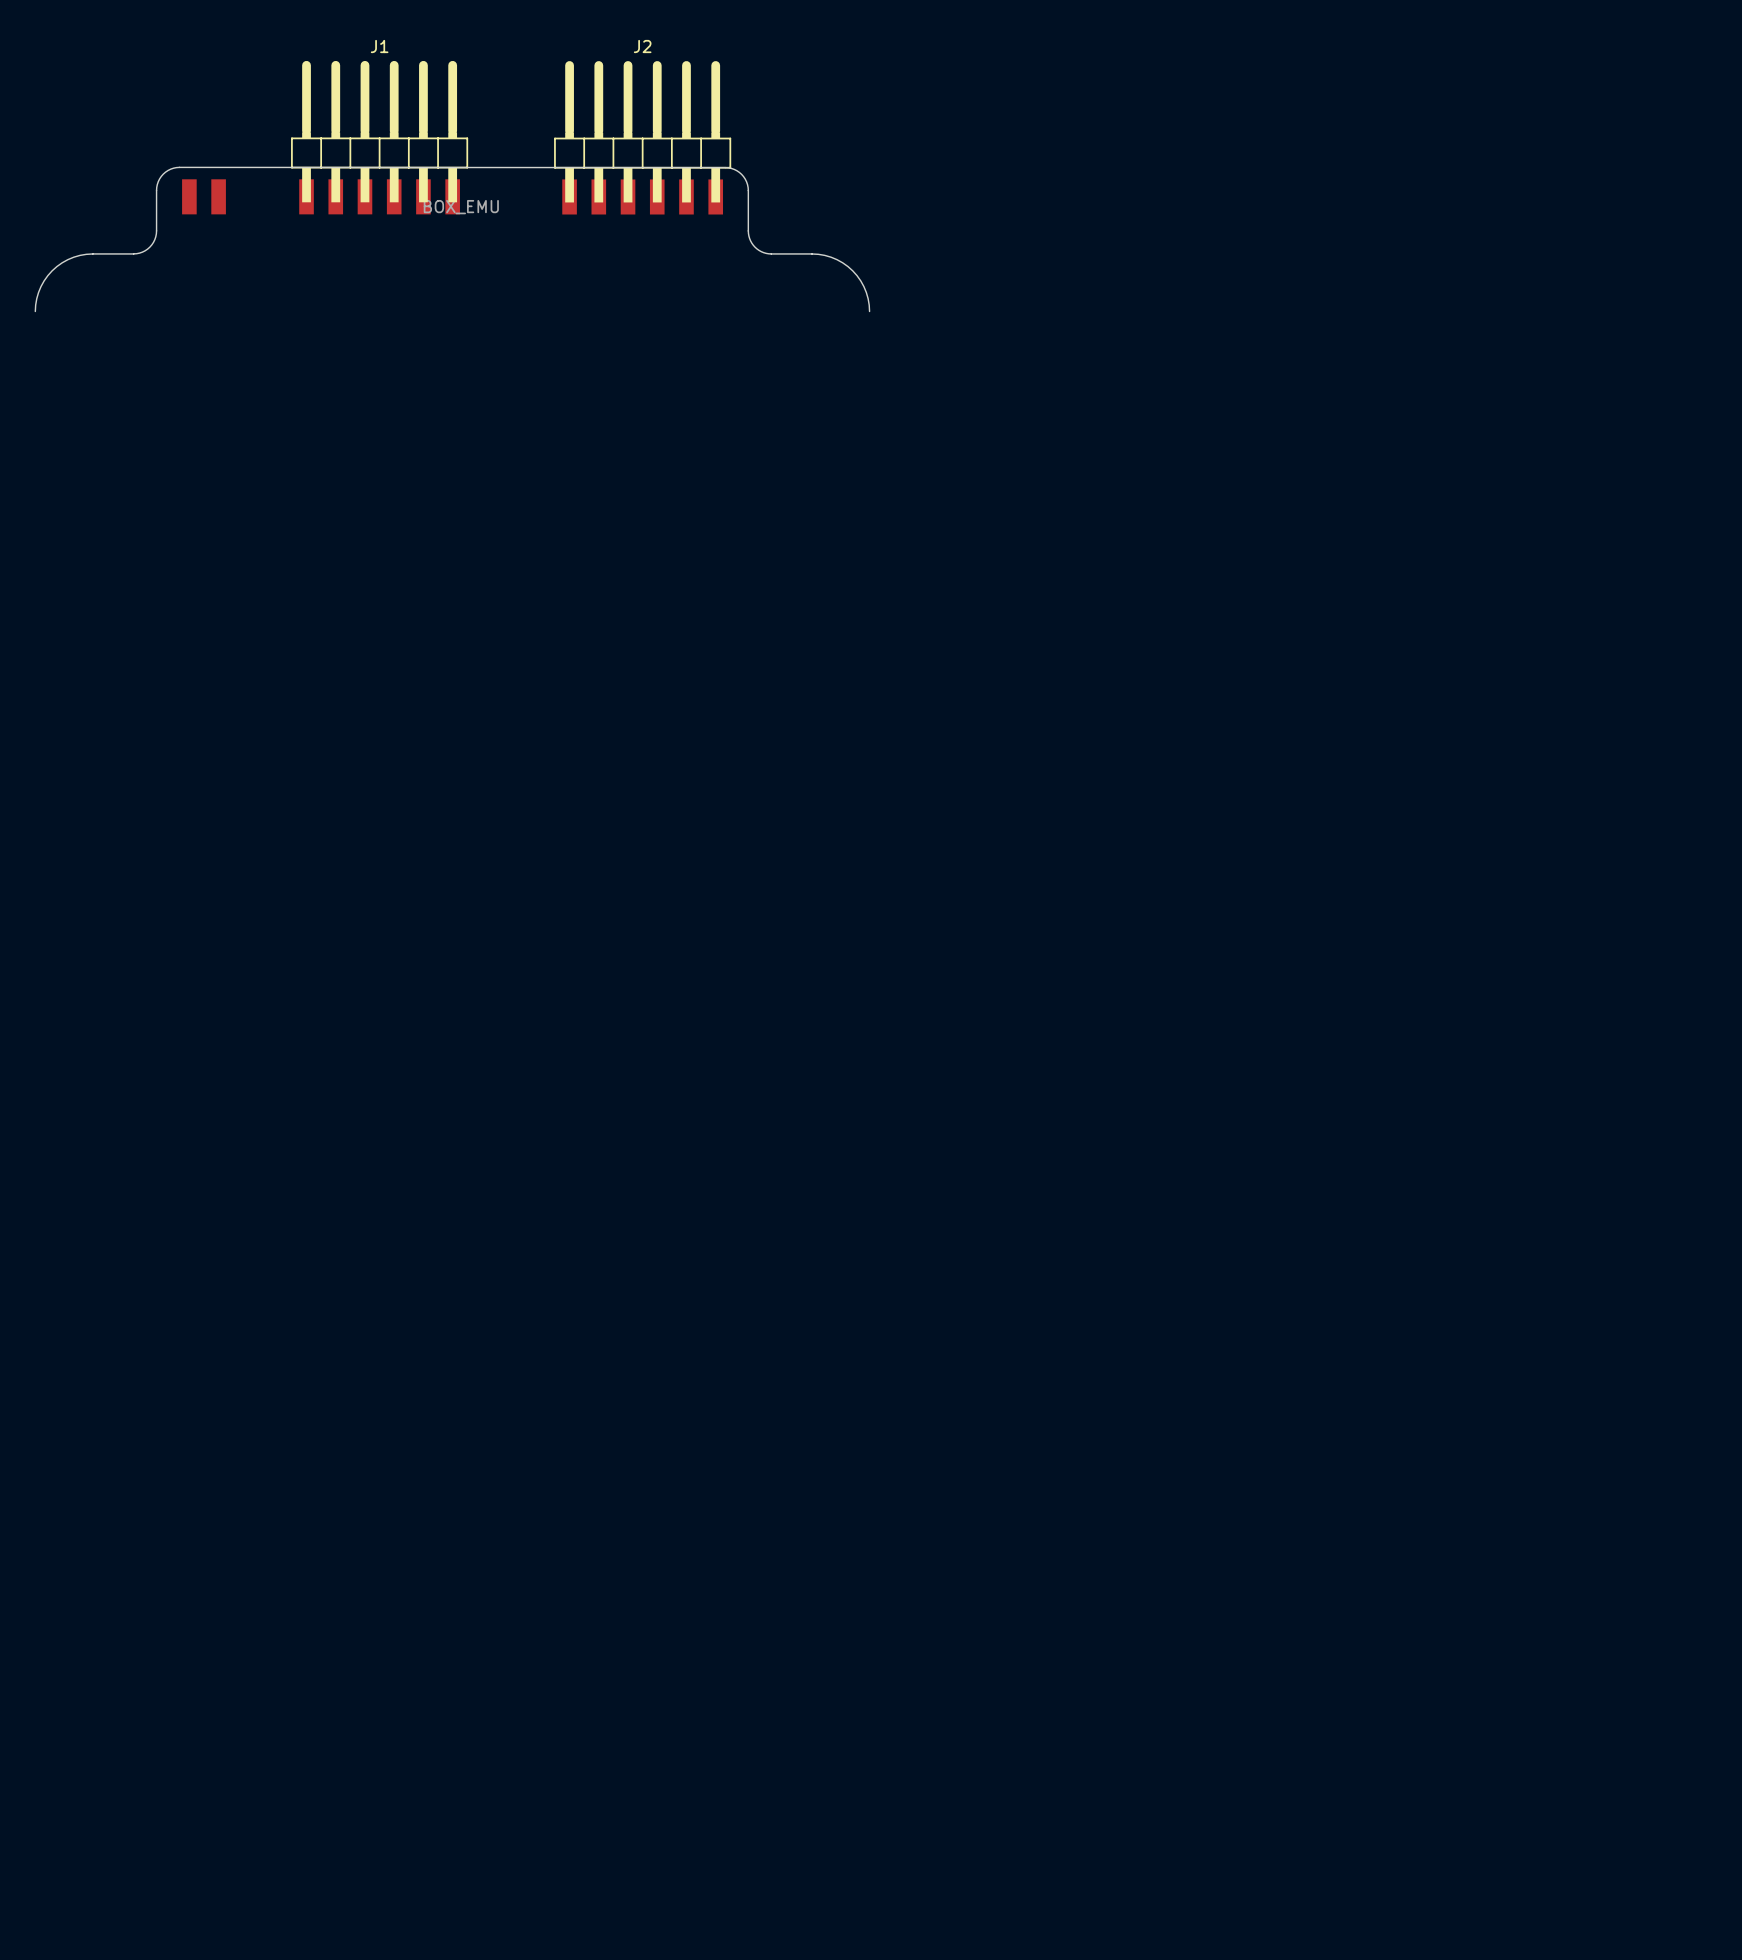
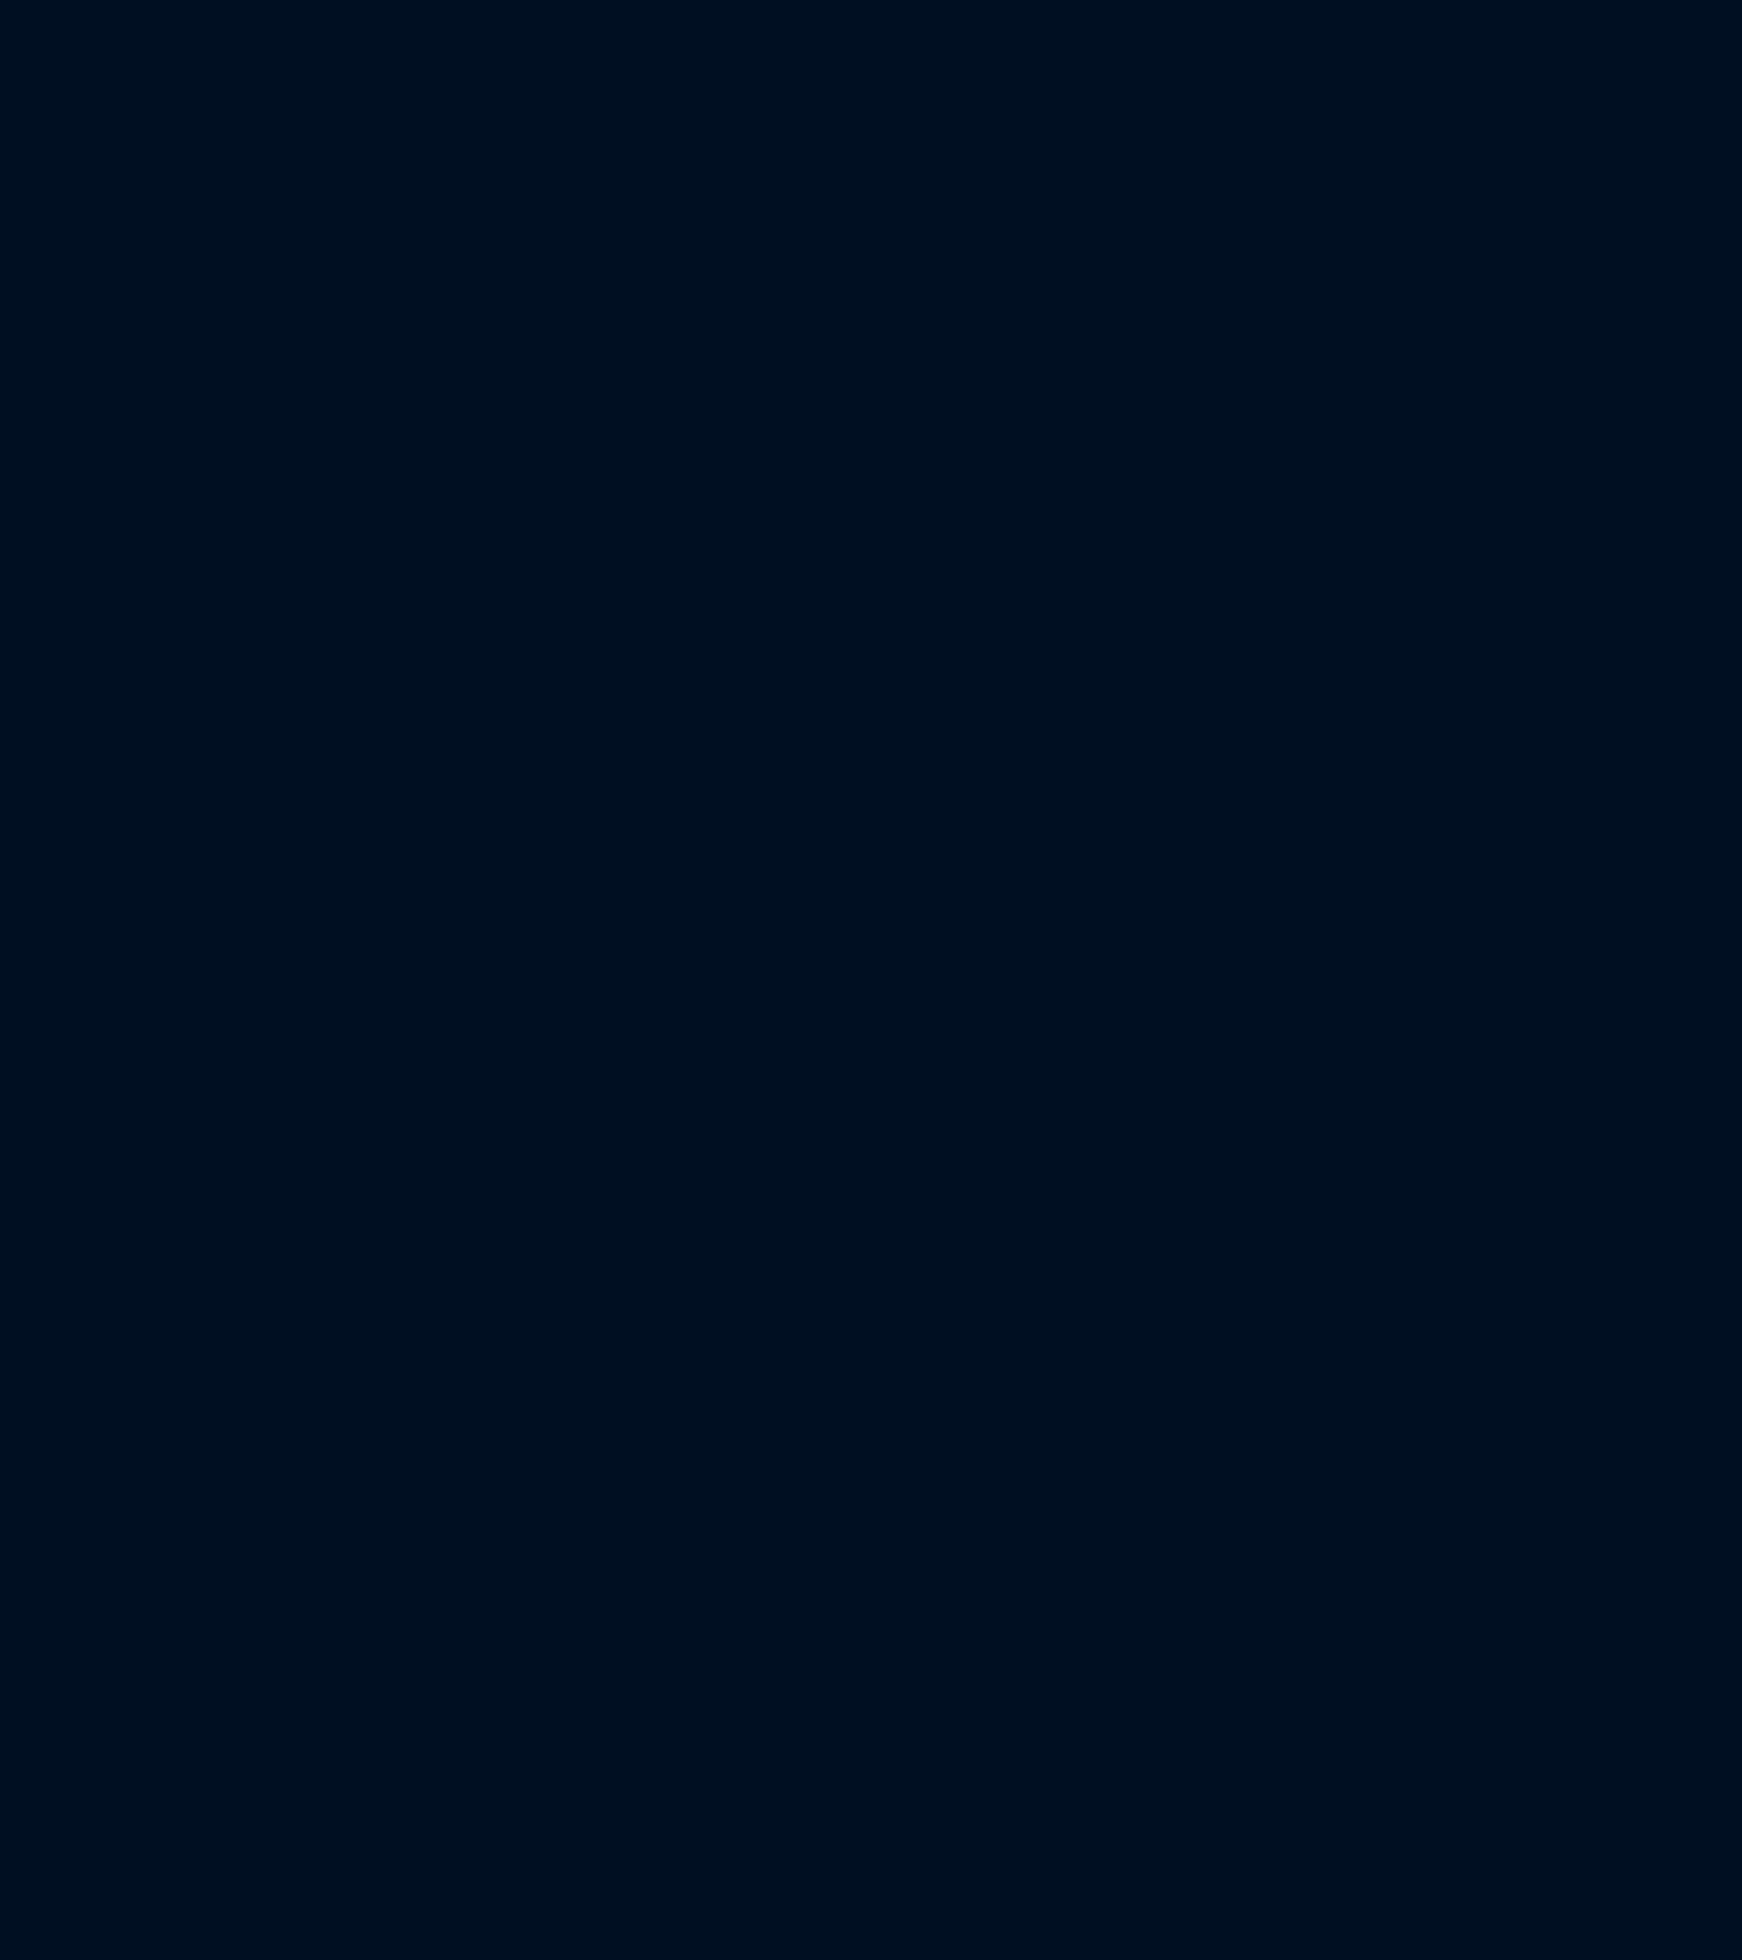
J1: (379, 137) -> none
J2: (642, 137) -> none
drawing: [35, 167, 870, 312] -> none
part: (204, 196) -> none

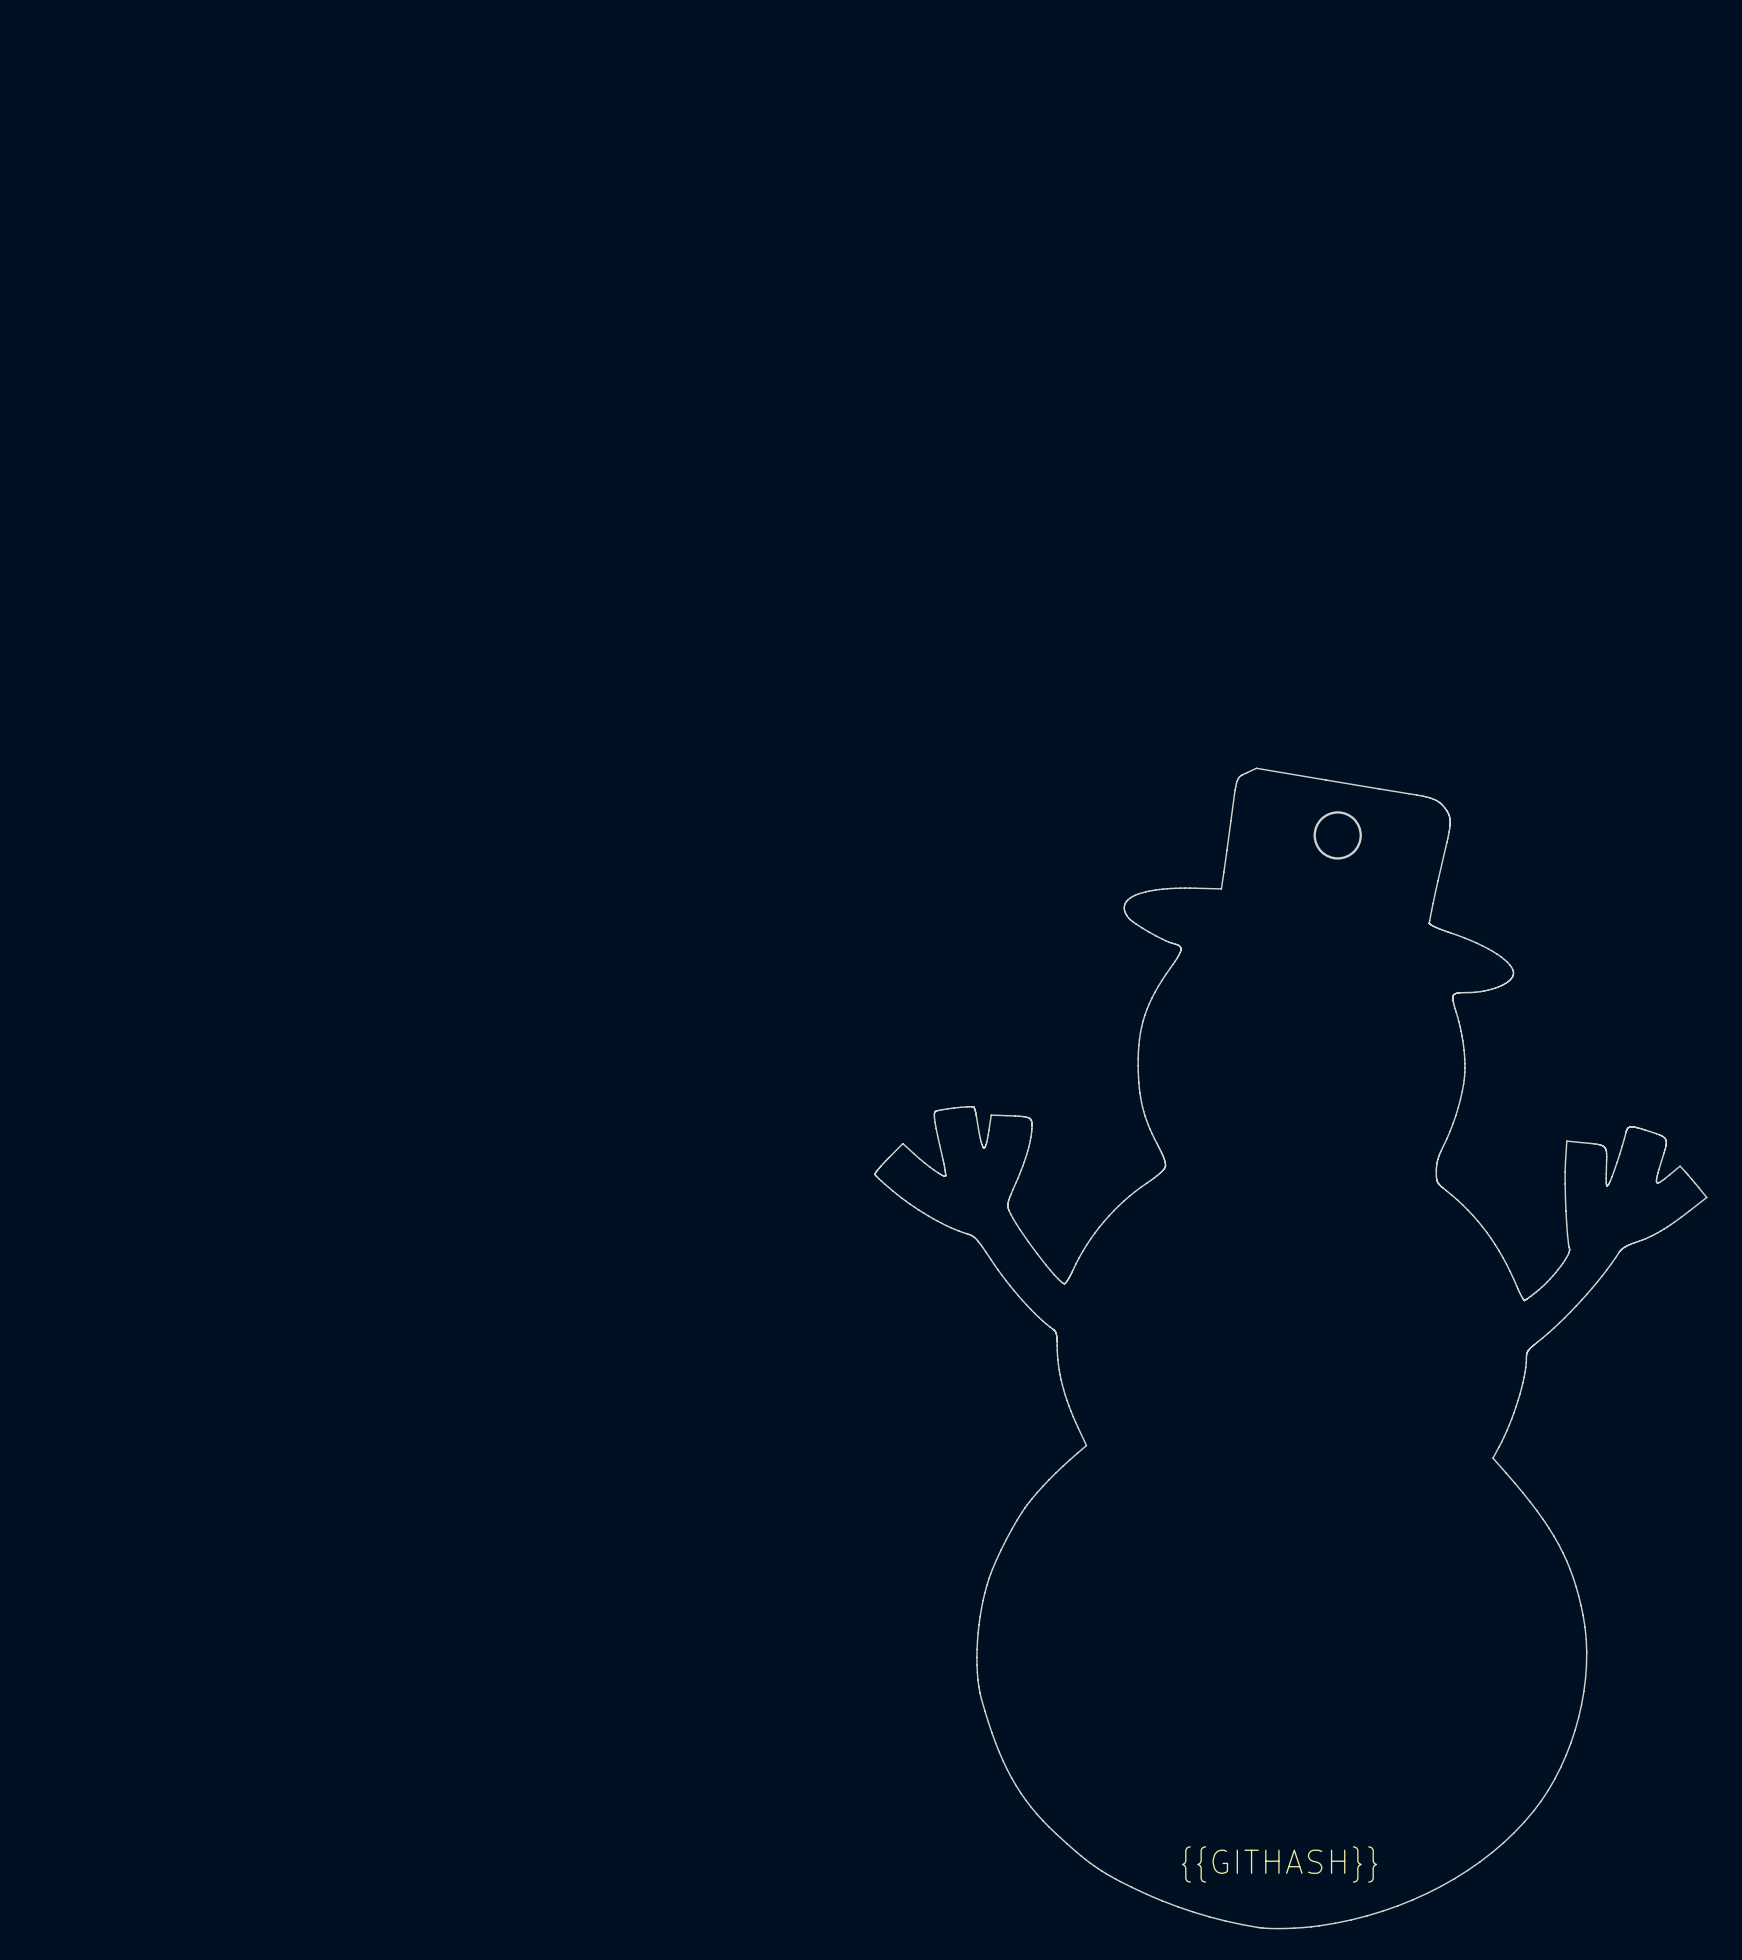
round board edge: none -> [1313, 811, 1362, 860]
board edge: none -> (1429, 923) (1450, 825) (1448, 813) (1440, 802) (1419, 795) (1256, 768) (1239, 776) (1235, 790) (1221, 888) (1180, 888) (1152, 890) (1133, 896) (1124, 904) (1125, 912) (1131, 920) (1180, 948) (1178, 956) (1149, 1003) (1143, 1021) (1138, 1045) (1138, 1077) (1141, 1102) (1146, 1120) (1162, 1155) (1165, 1166) (1158, 1174) (1124, 1200) (1103, 1221) (1086, 1245) (1065, 1283)
board edge: none -> (1429, 923) (1487, 948) (1504, 959) (1513, 970) (1510, 979) (1498, 986) (1480, 991) (1457, 993) (1453, 995) (1463, 1045) (1464, 1076) (1455, 1115) (1437, 1159) (1436, 1175) (1439, 1184) (1468, 1210) (1491, 1238) (1524, 1300)
board edge: none -> (973, 1107) (954, 1108) (934, 1112) (935, 1122) (945, 1175)
board edge: none -> (974, 1107) (984, 1147) (991, 1115) (1023, 1116) (1031, 1120) (1028, 1147) (1009, 1198) (1008, 1207) (1016, 1224) (1037, 1253) (1054, 1274) (1064, 1283)
board edge: none -> (875, 1173) (902, 1143) (929, 1166) (945, 1176)
board edge: none -> (874, 1174) (892, 1190) (919, 1210) (946, 1225) (974, 1237) (1018, 1295) (1054, 1330) (1063, 1389) (1086, 1445) (1049, 1479) (1022, 1511) (996, 1559) (983, 1600) (977, 1649) (978, 1686) (991, 1732) (1011, 1778) (1025, 1800) (1049, 1827) (1085, 1859) (1110, 1876) (1146, 1894) (1193, 1912) (1241, 1924) (1277, 1928) (1319, 1925) (1367, 1915) (1412, 1899) (1454, 1878) (1492, 1852) (1524, 1822) (1548, 1790) (1566, 1755) (1578, 1717) (1585, 1678) (1586, 1639) (1578, 1596) (1566, 1561) (1548, 1527) (1522, 1492) (1492, 1458) (1516, 1406) (1528, 1349) (1581, 1300) (1621, 1249) (1663, 1229) (1706, 1197) (1680, 1166) (1657, 1182) (1665, 1139) (1659, 1134) (1633, 1127) (1626, 1129) (1614, 1170) (1607, 1185)
board edge: none -> (1606, 1185) (1606, 1154) (1604, 1147) (1597, 1144) (1566, 1141) (1565, 1197) (1569, 1251) (1550, 1278) (1524, 1300)
text: none -> {{GITHASH}} (1279, 1864)

